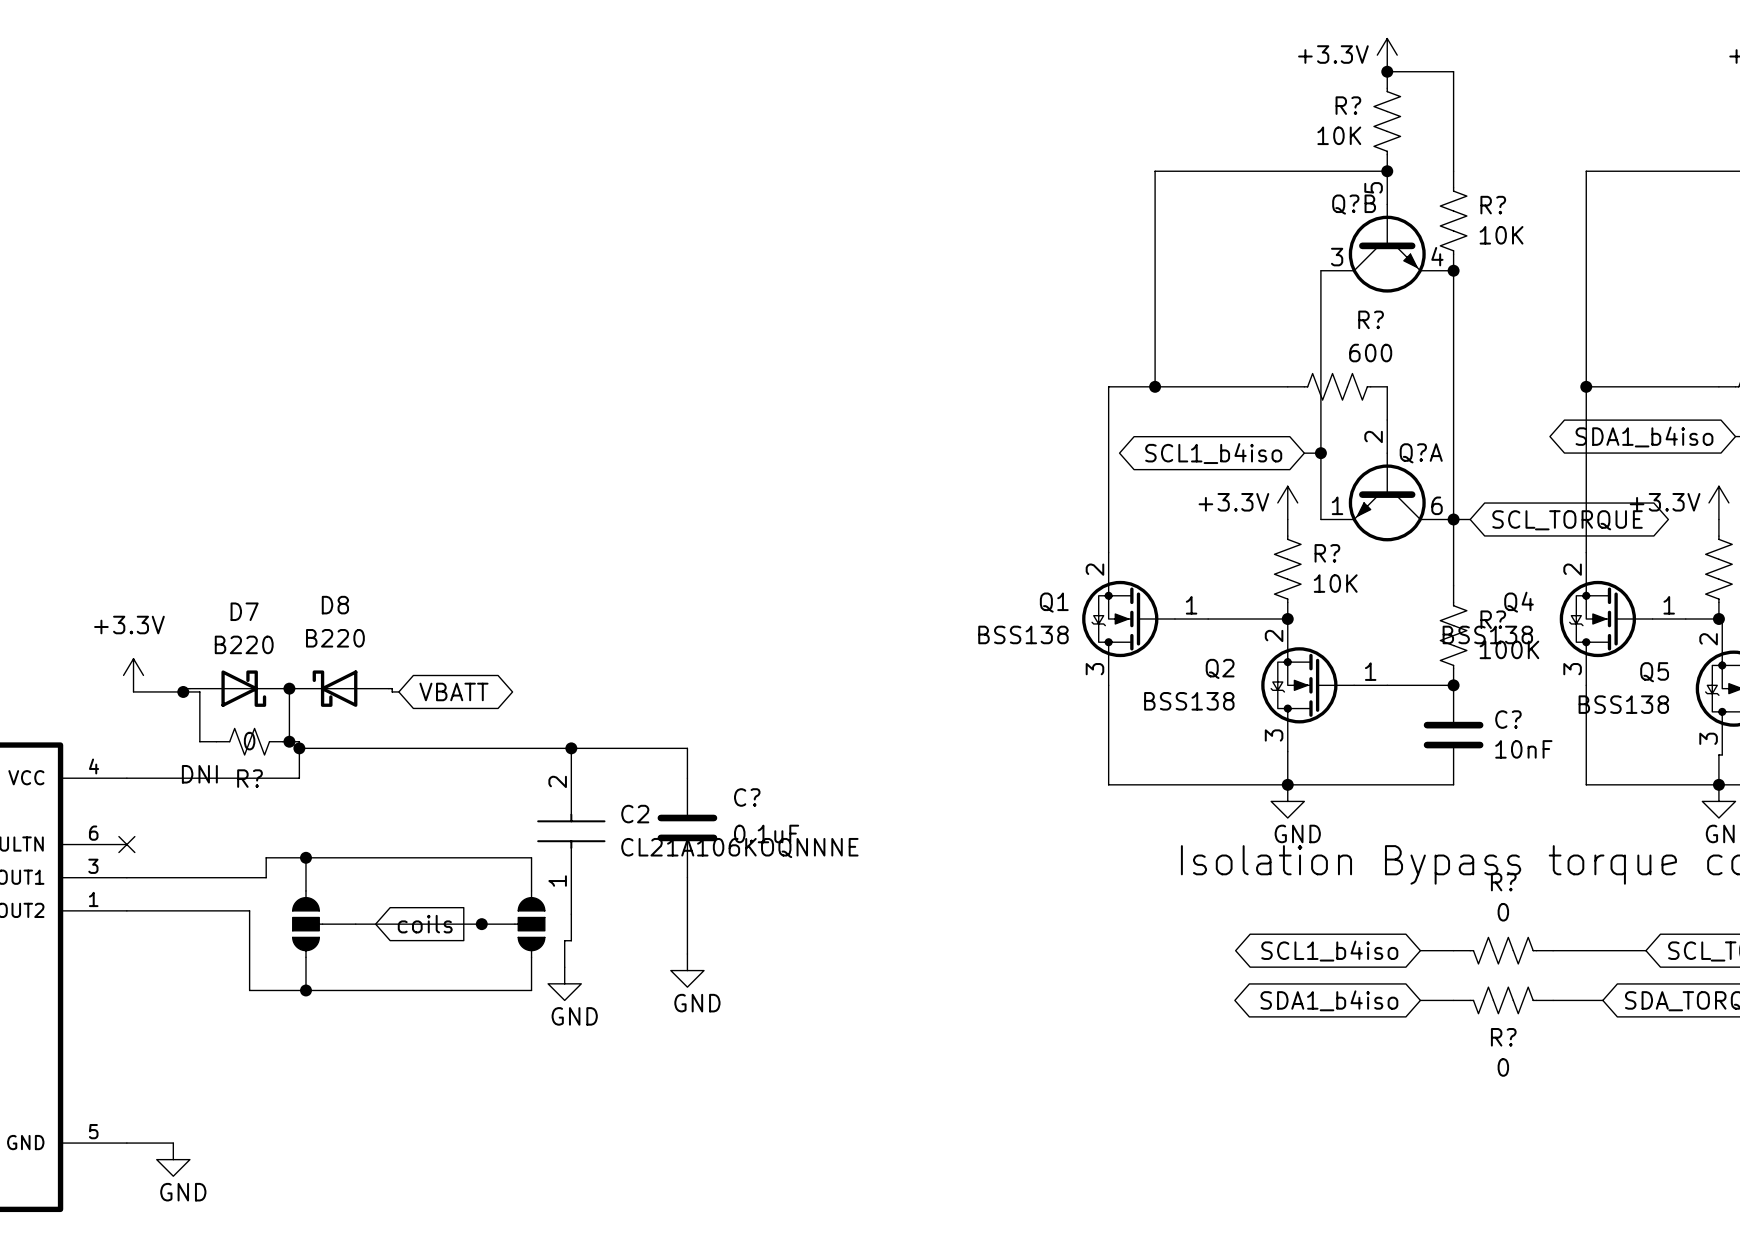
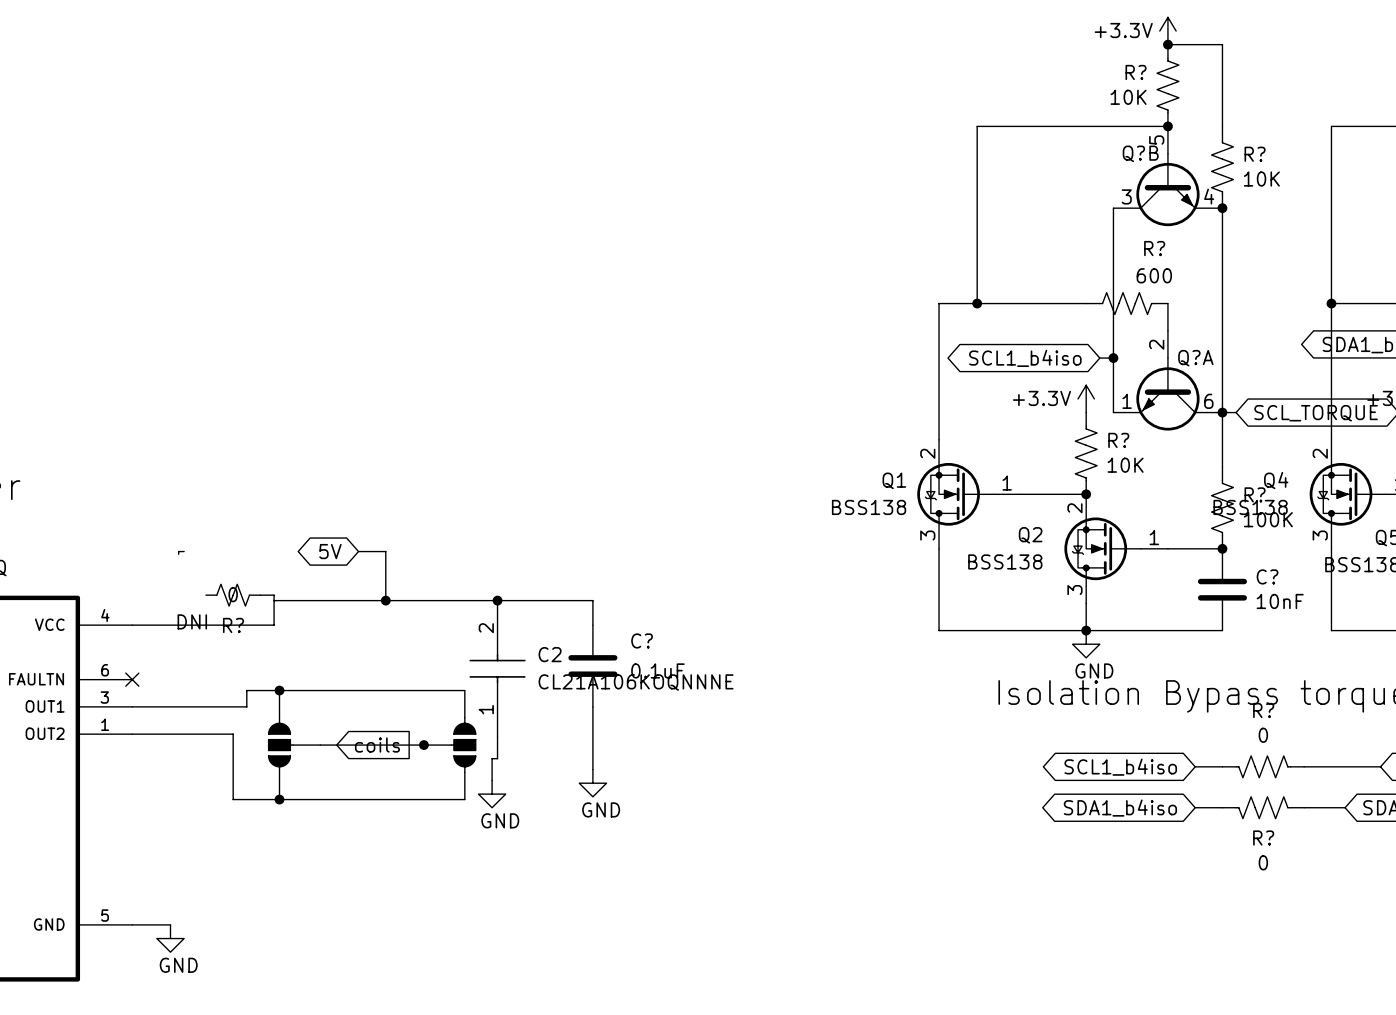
power symbol: +3.3V (133, 675) -> none
D7: B220 (239, 688) -> none
wire: (289, 688) (289, 741) -> none
junction: (289, 688) -> none
D8: B220 (339, 688) -> none
wire: (388, 688) (392, 688) (392, 691) (398, 691) -> none
wire: none -> (358, 551) (385, 551) (385, 600)
wire: (133, 691) (199, 691) (199, 741) (216, 741) -> none
junction: (183, 691) -> none
global label: VBATT (453, 691) -> 5V (330, 551)
junction: (289, 741) -> none
junction: (299, 748) -> none
junction: none -> (385, 600)

